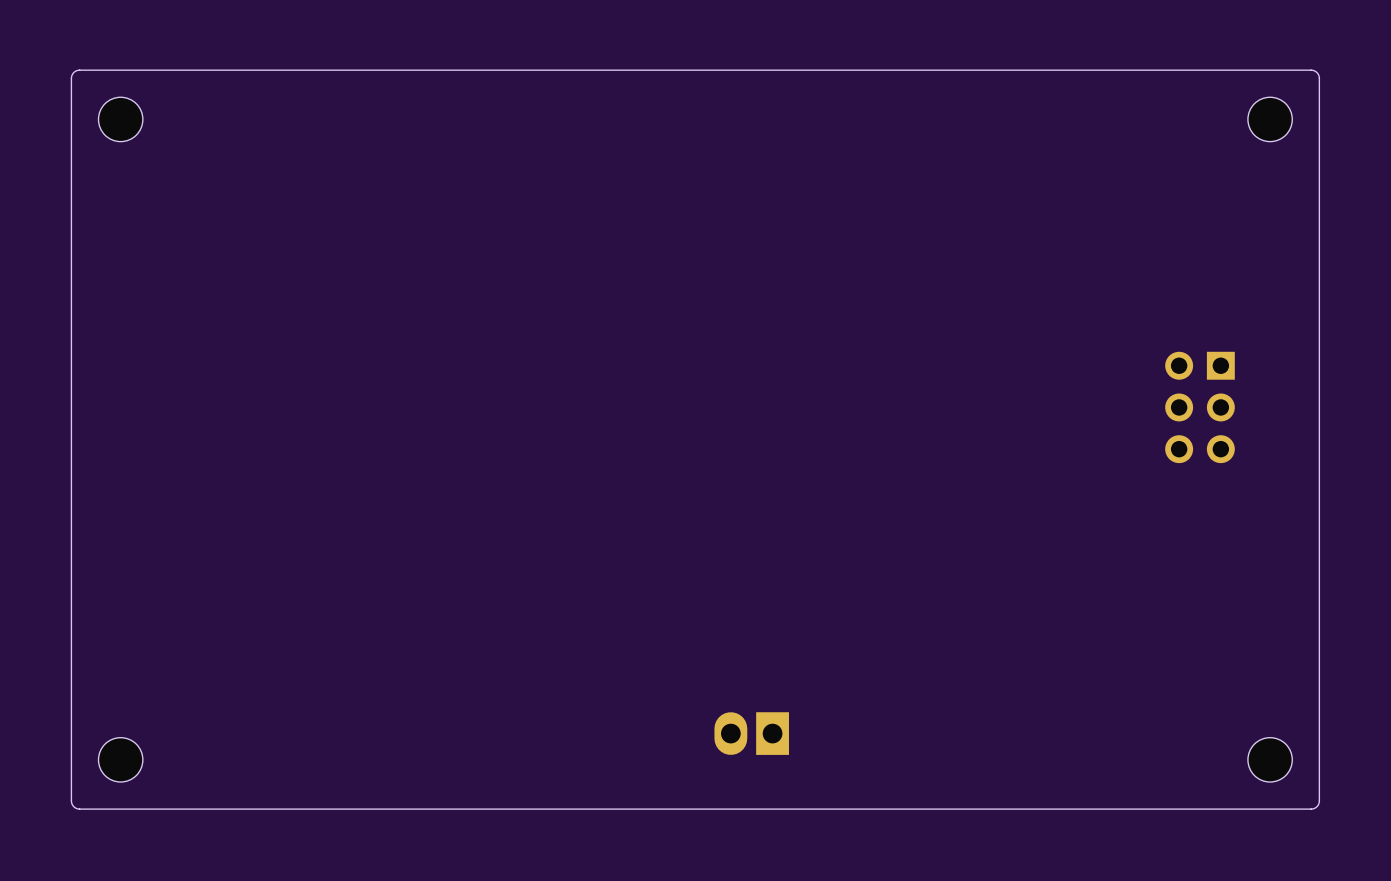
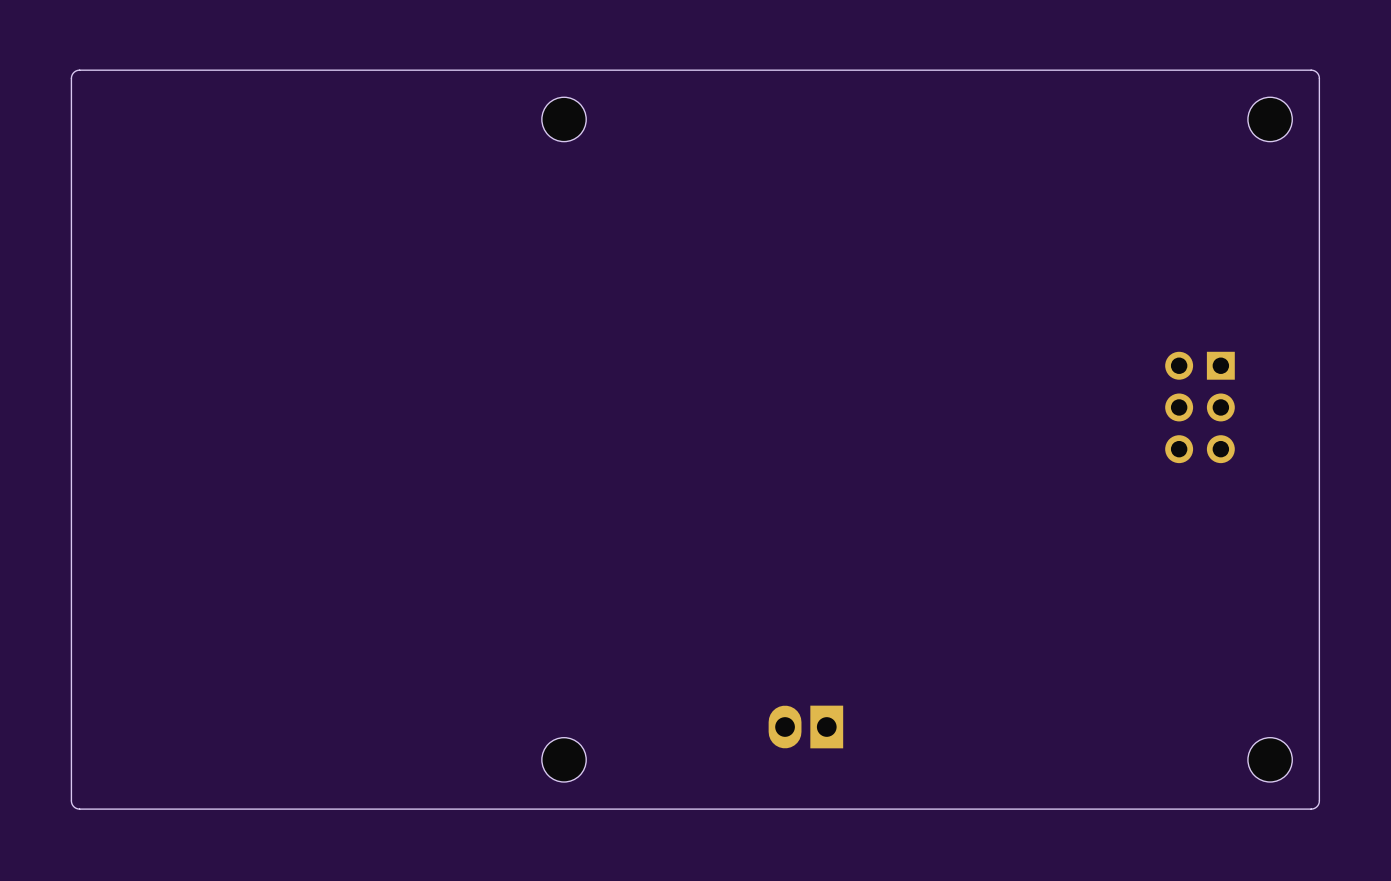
part: (120, 119) -> none
part: none -> (564, 119)
part position: (751, 733) -> (805, 727)
part: (120, 759) -> none
part: none -> (564, 759)

